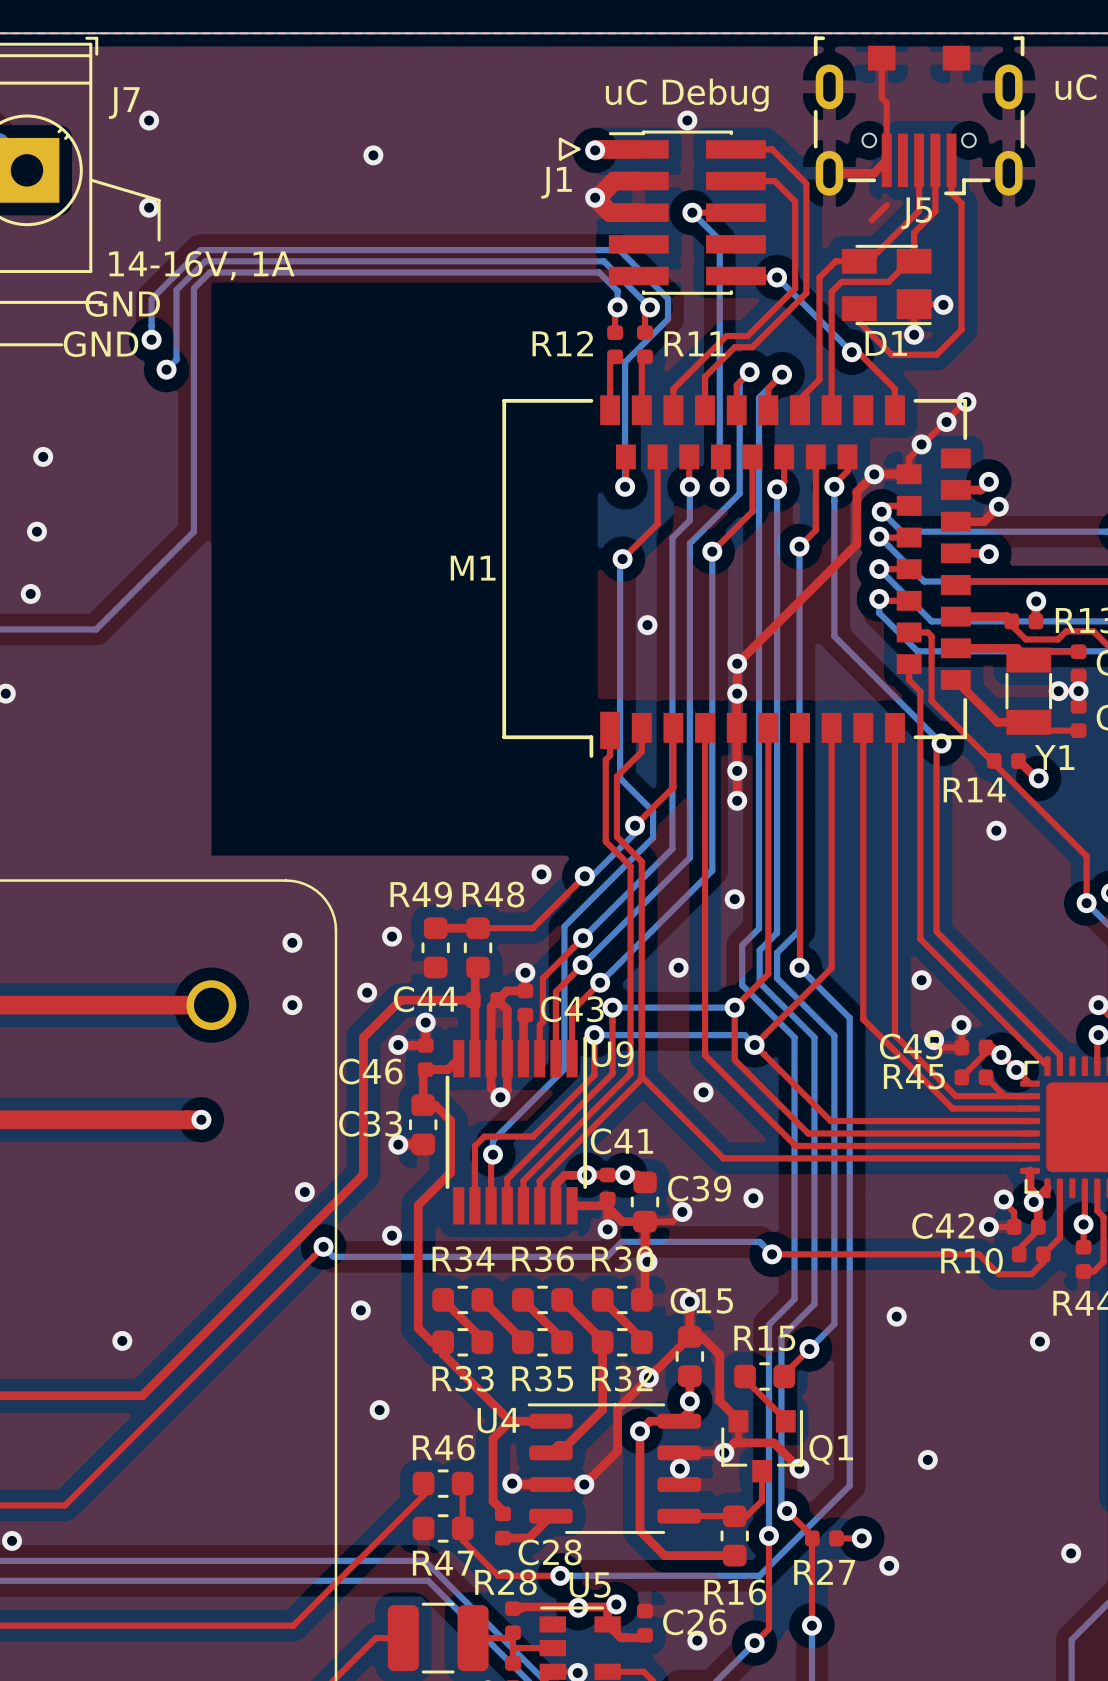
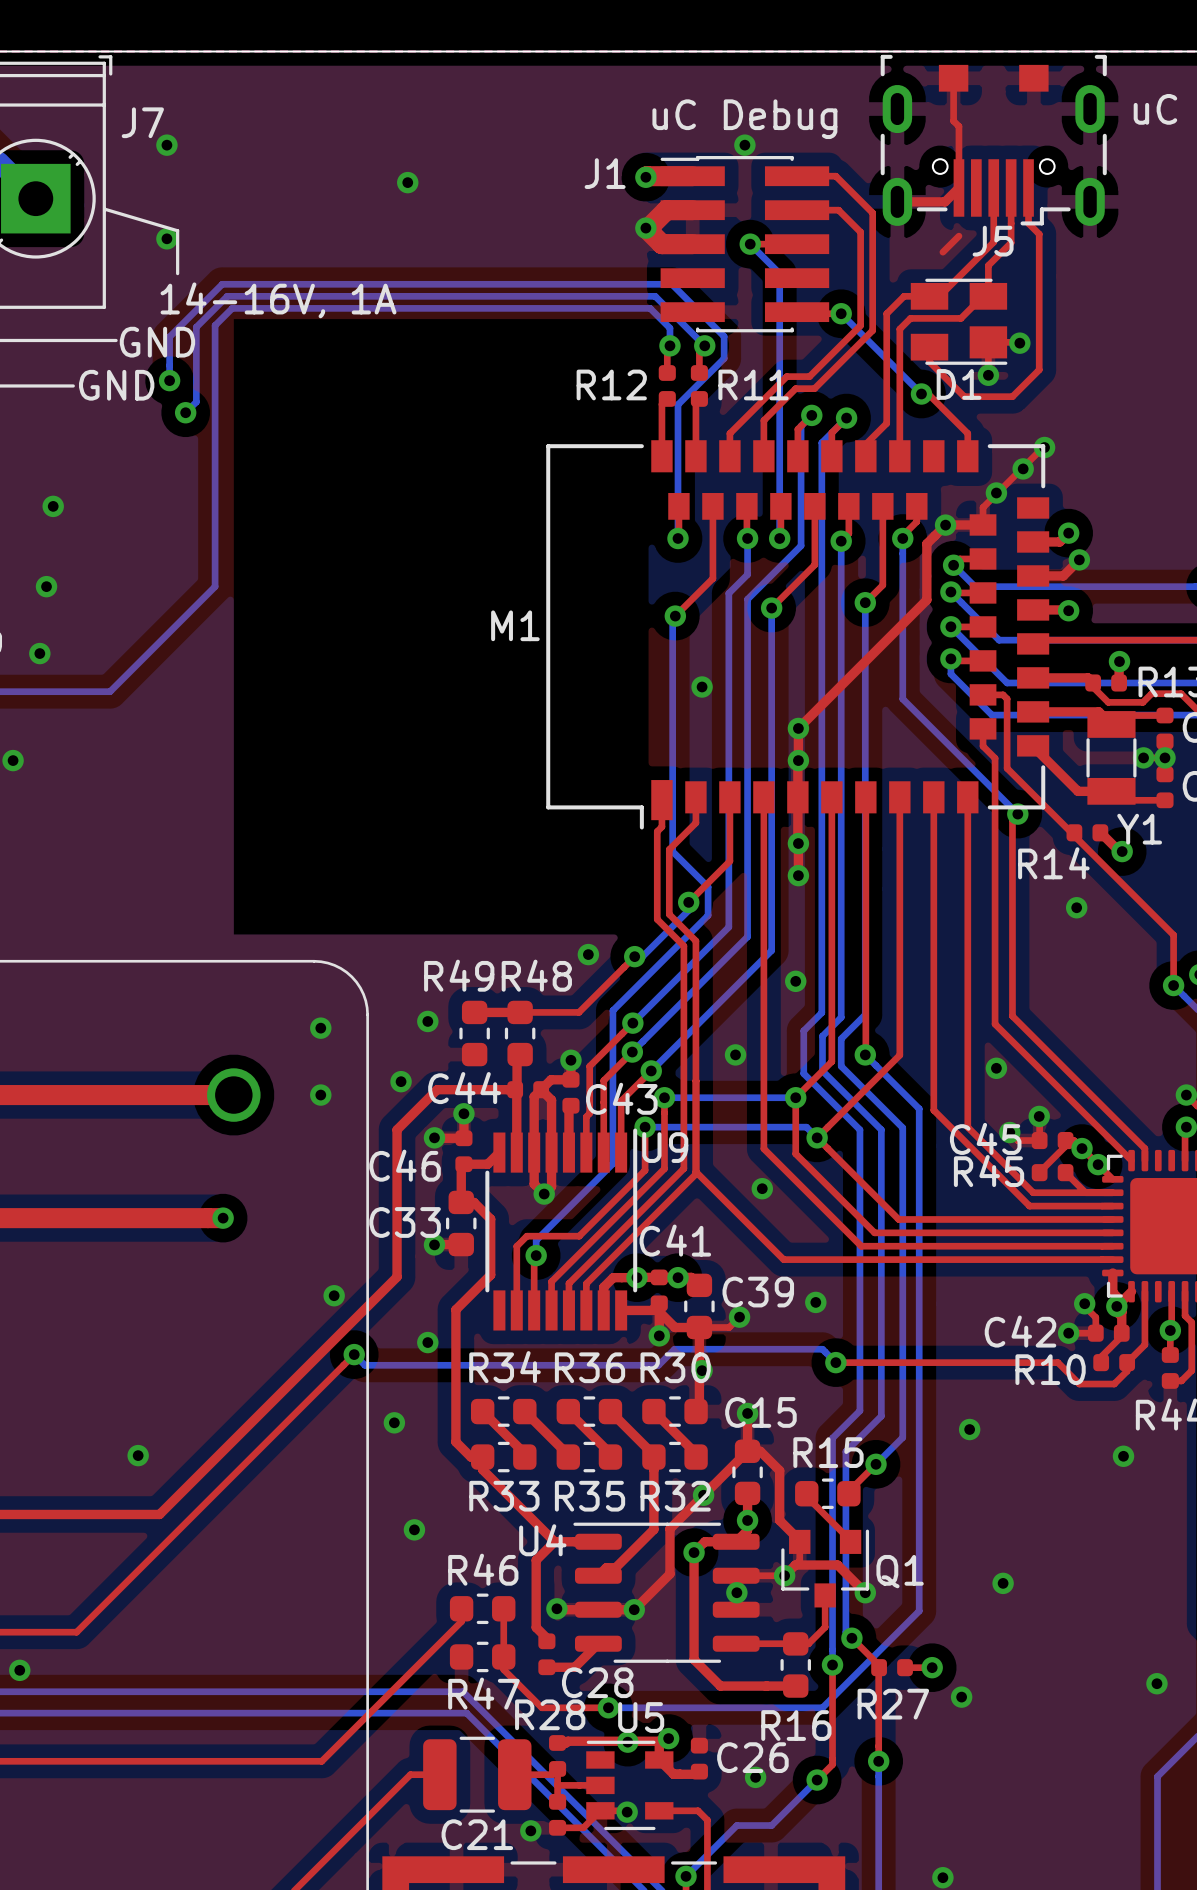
line: (560, 139) (578, 149) (560, 159) (560, 139) -> none
J1 name position: J1 (556, 182) -> J1 (605, 173)

